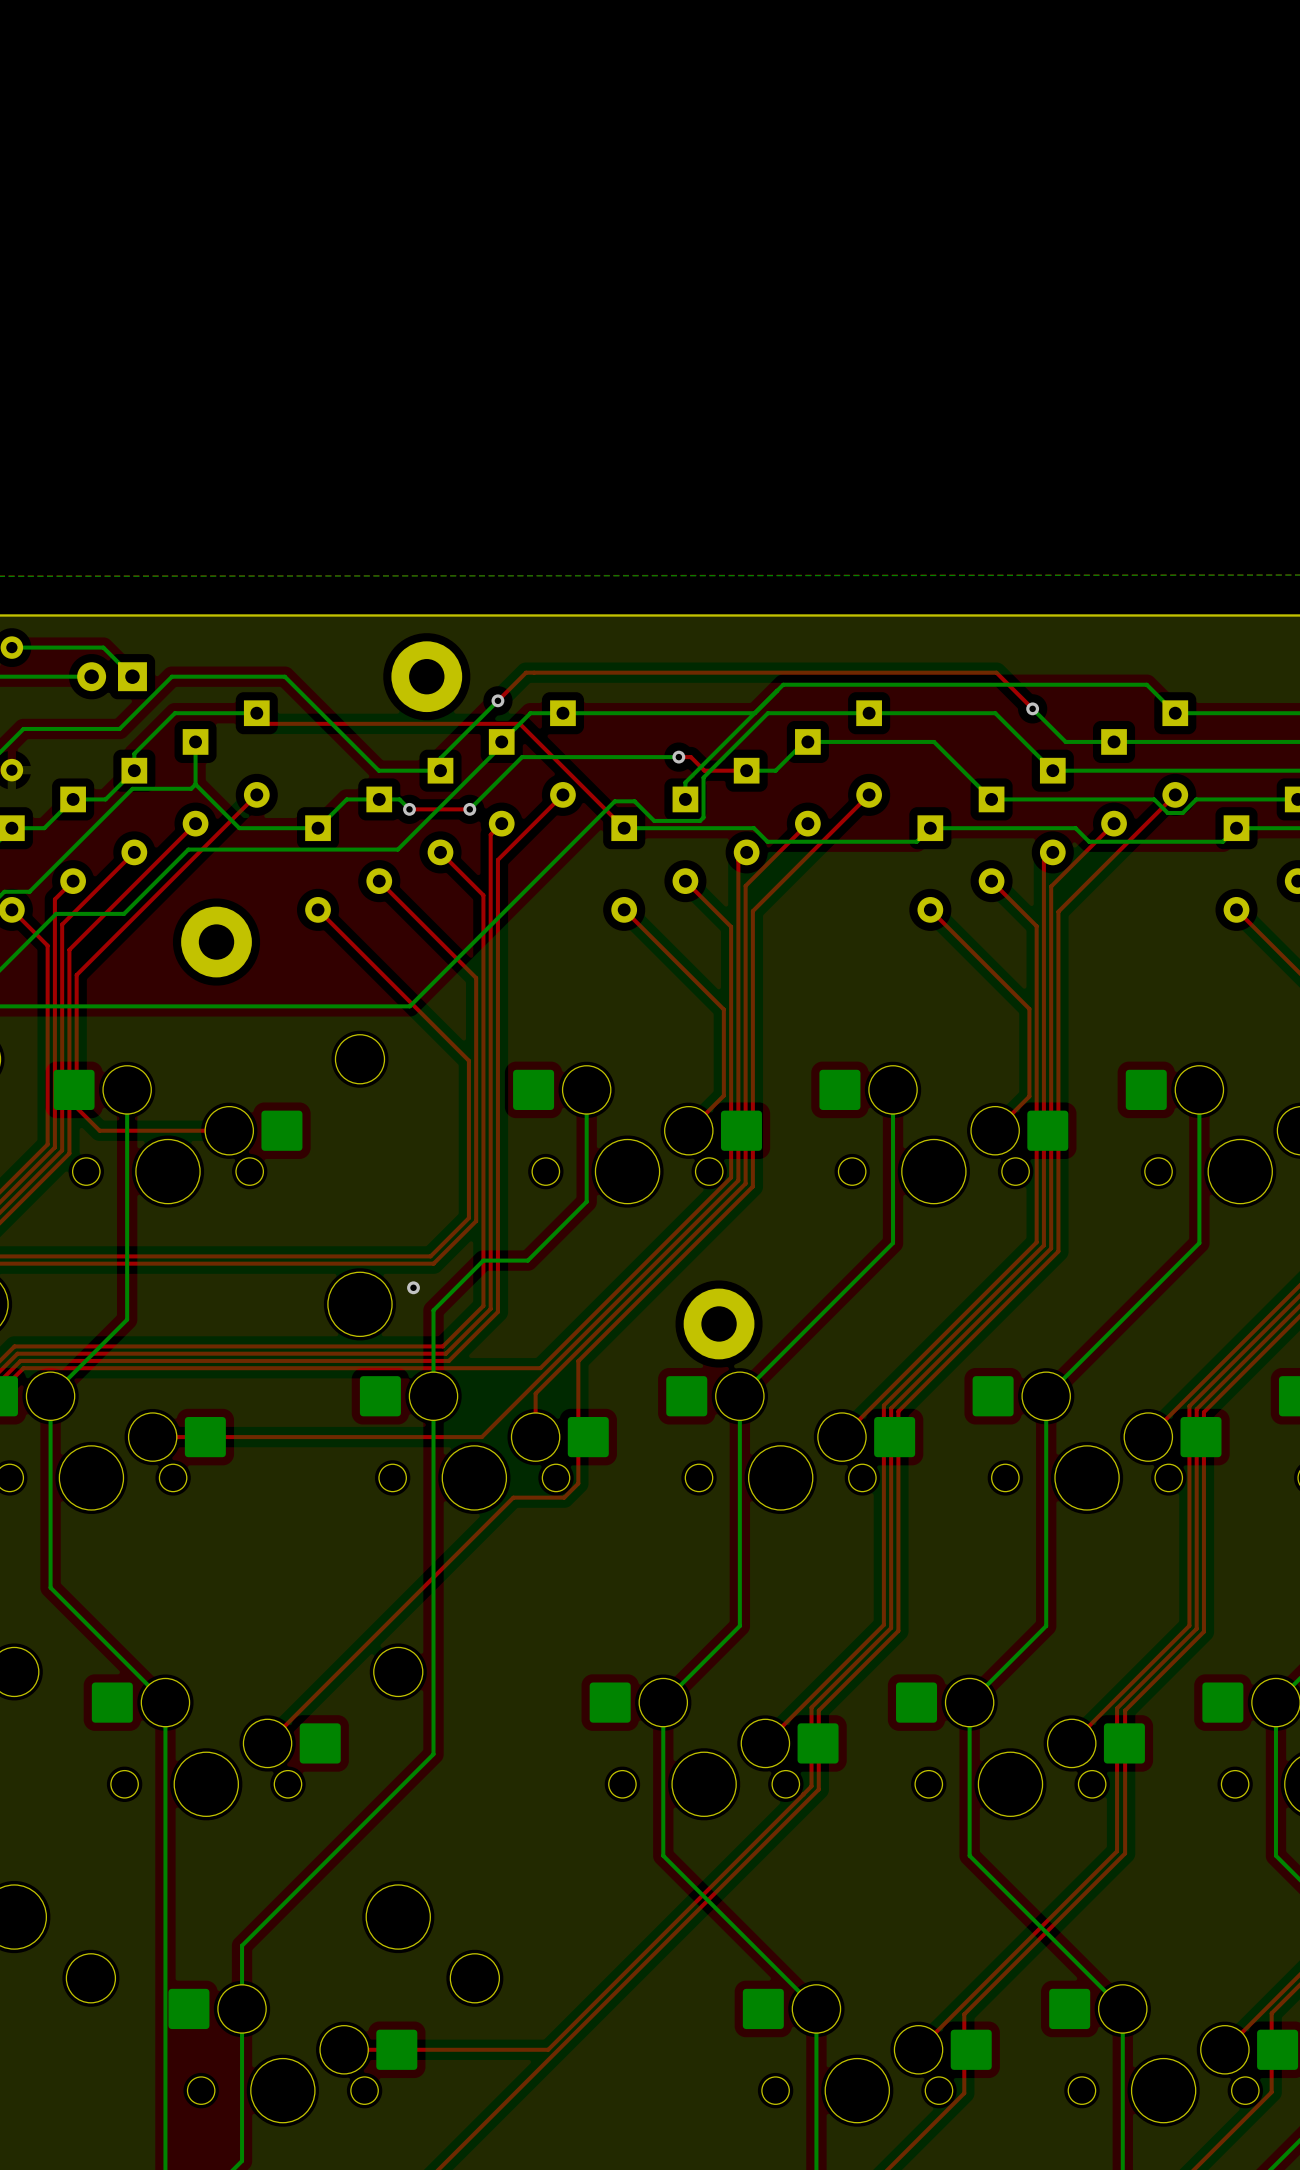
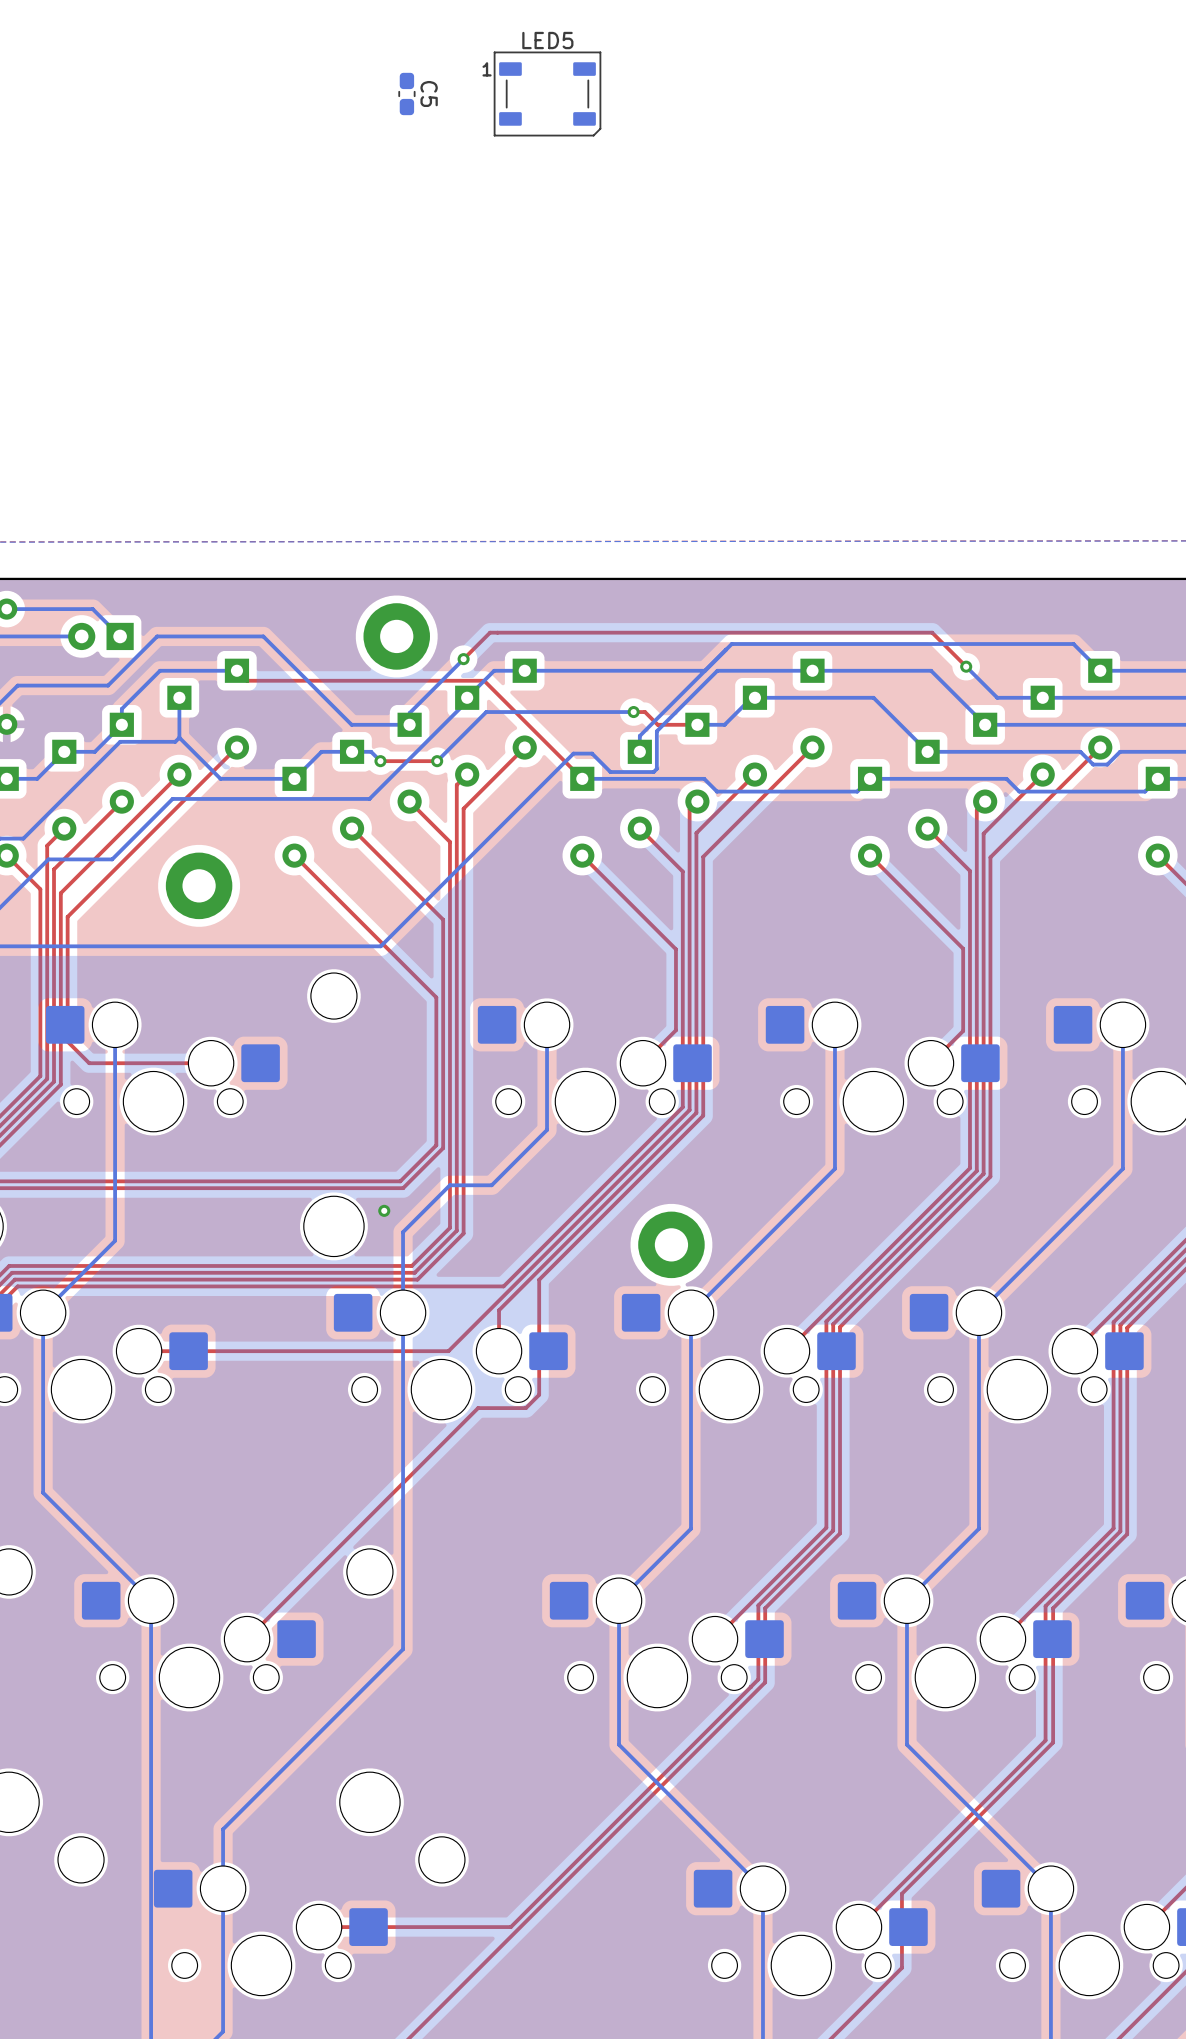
C5: none -> (406, 93)
LED5: none -> (547, 93)

